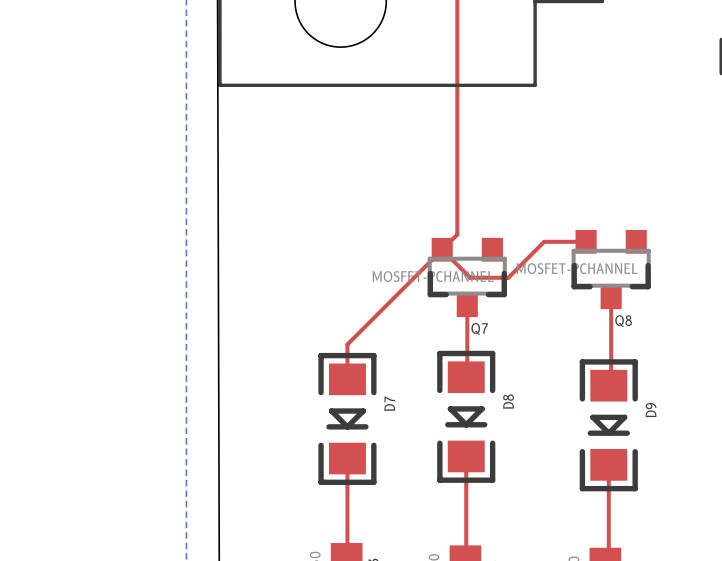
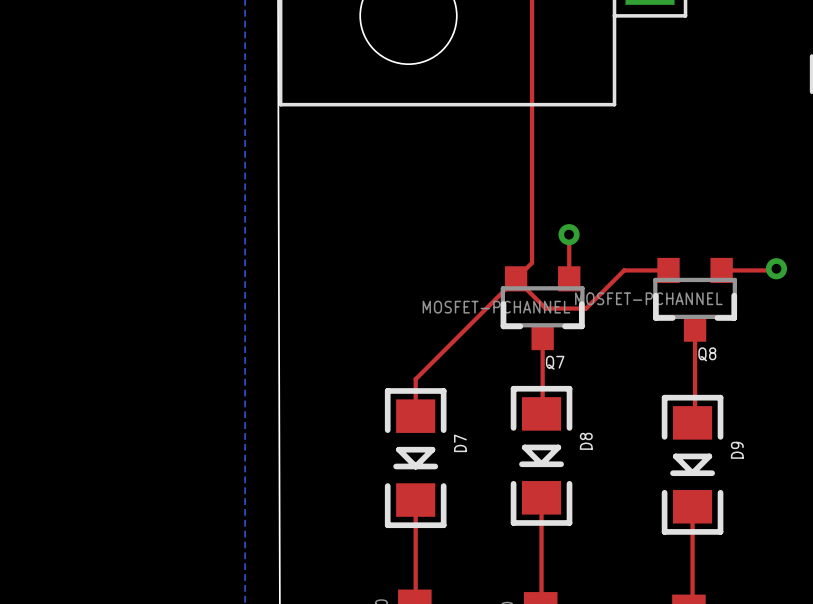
top track: none -> (569, 234) (569, 278)
via: none -> (569, 234)
top track: none -> (776, 268) (771, 270) (721, 270)
via: none -> (776, 268)

